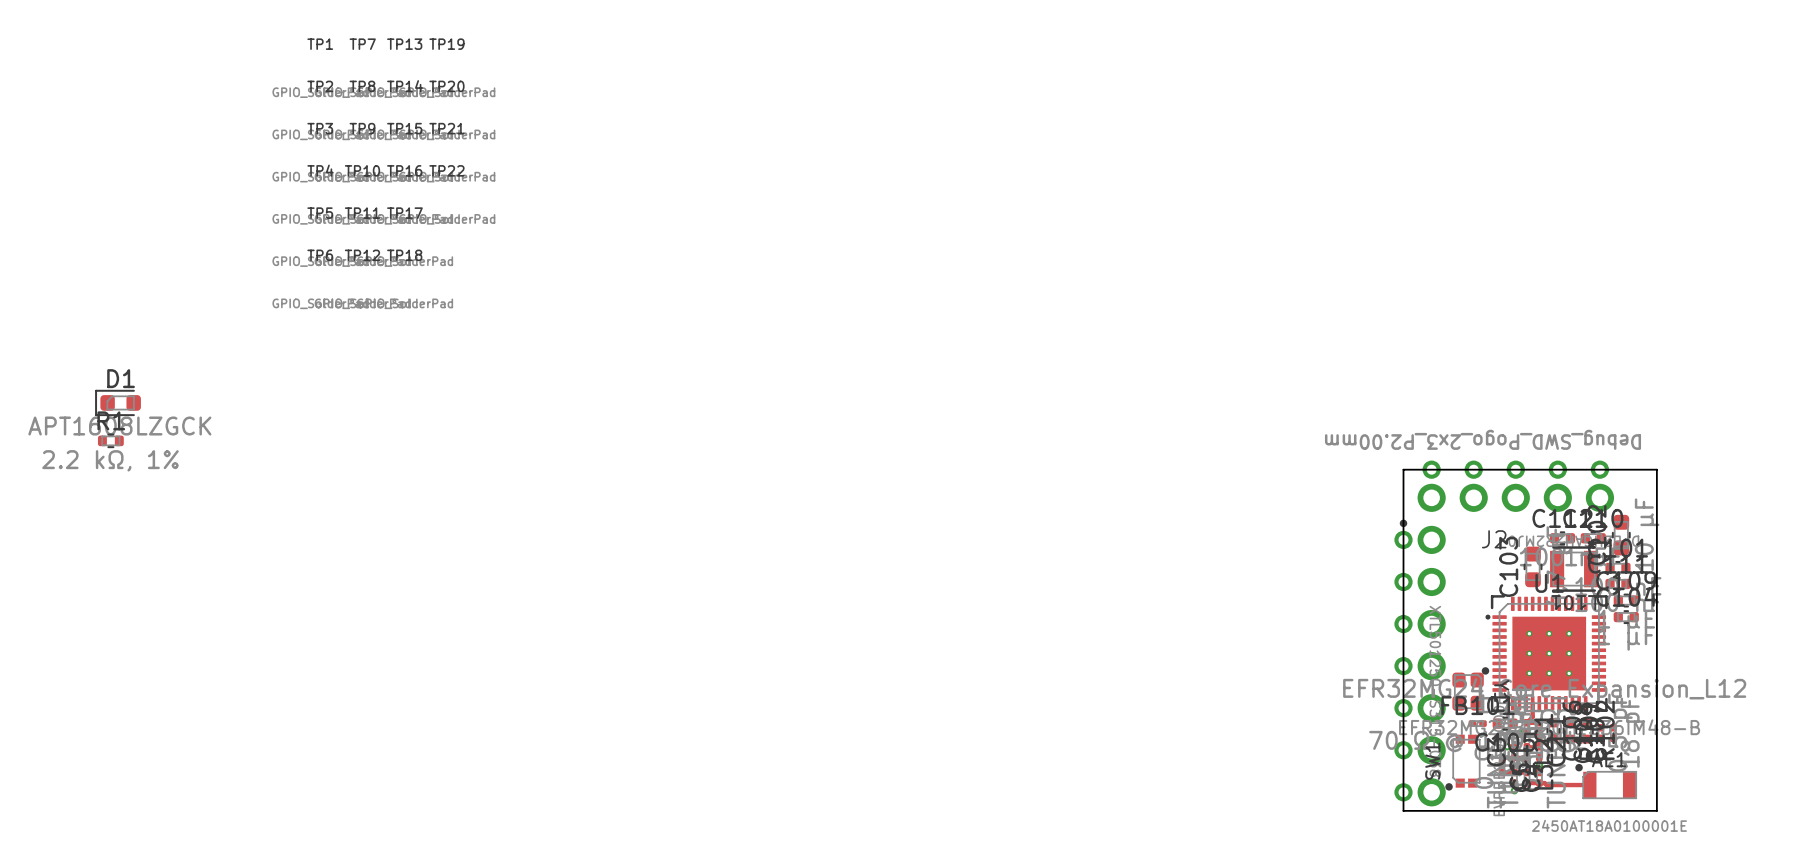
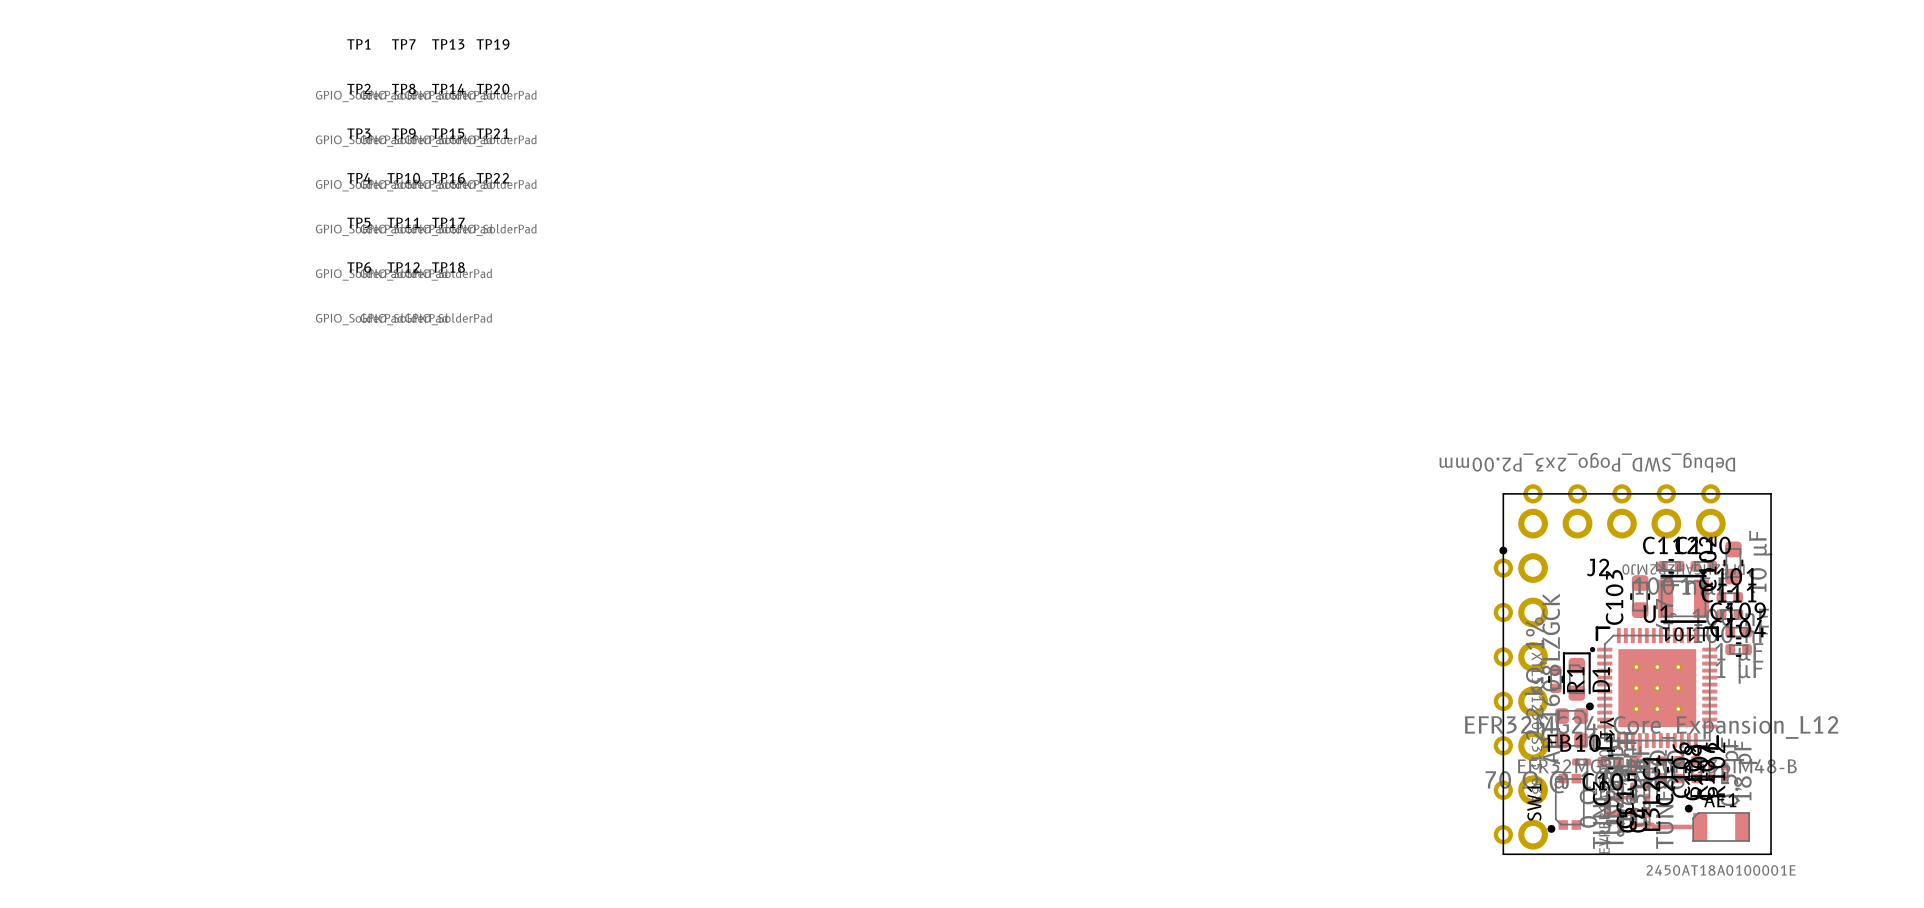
D1 rotation: 0° (118, 402) -> 90° clockwise (1576, 676)
D1 position: (118, 402) -> (1576, 676)
R1 rotation: 0° (110, 440) -> 90° clockwise (1555, 679)
R1 position: (110, 440) -> (1555, 679)

